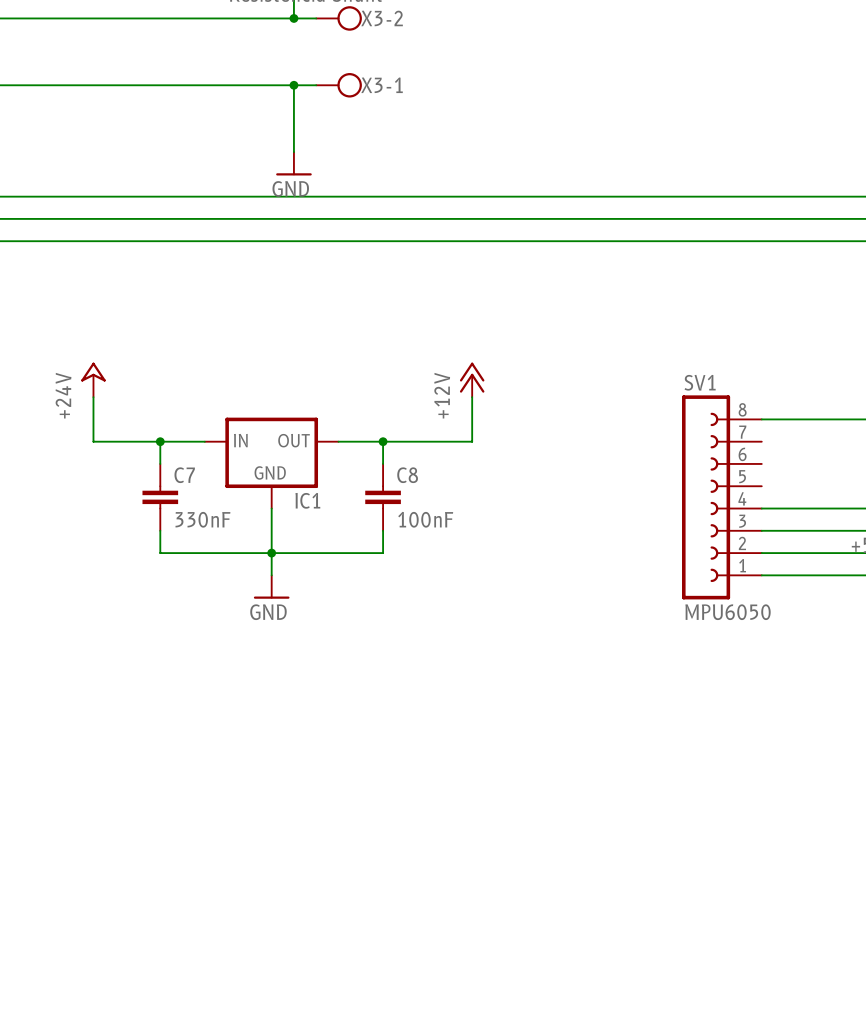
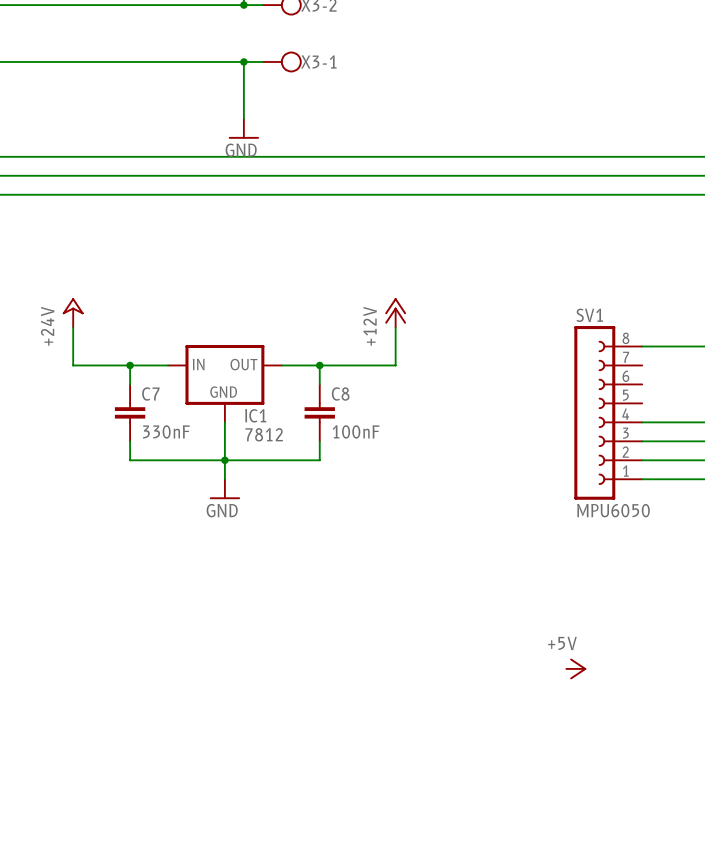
IC1 value: none -> 7812 (264, 434)
power symbol: none -> +5V (576, 668)

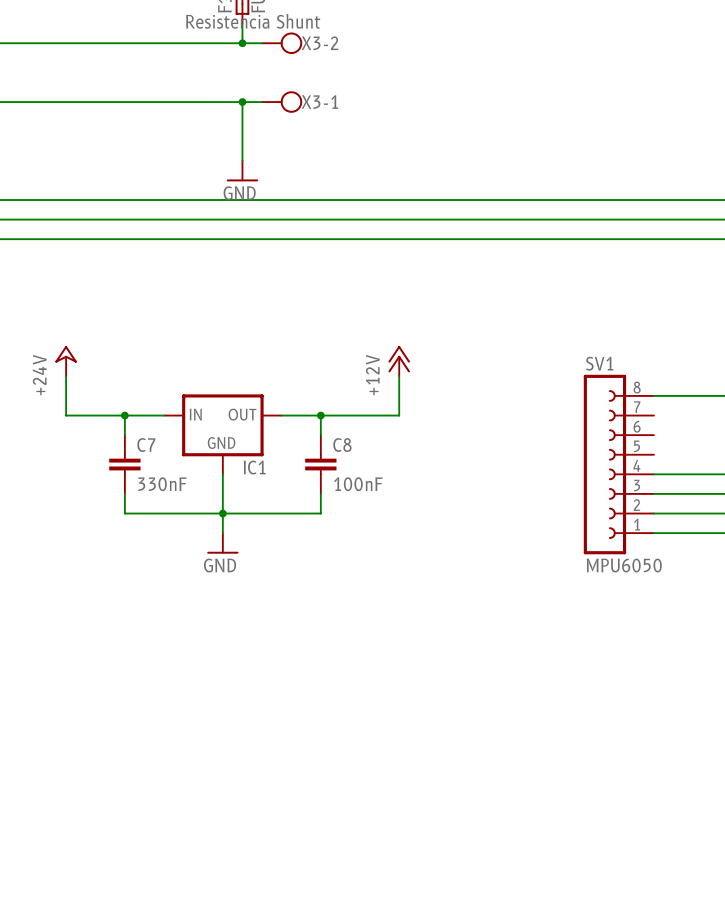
IC1 value: 7812 (264, 434) -> none
power symbol: +5V (576, 668) -> none

